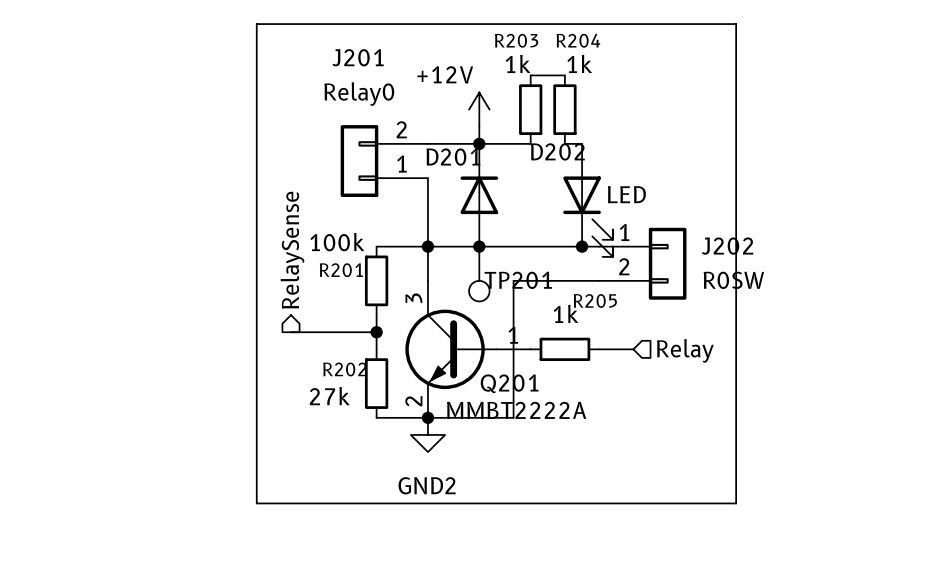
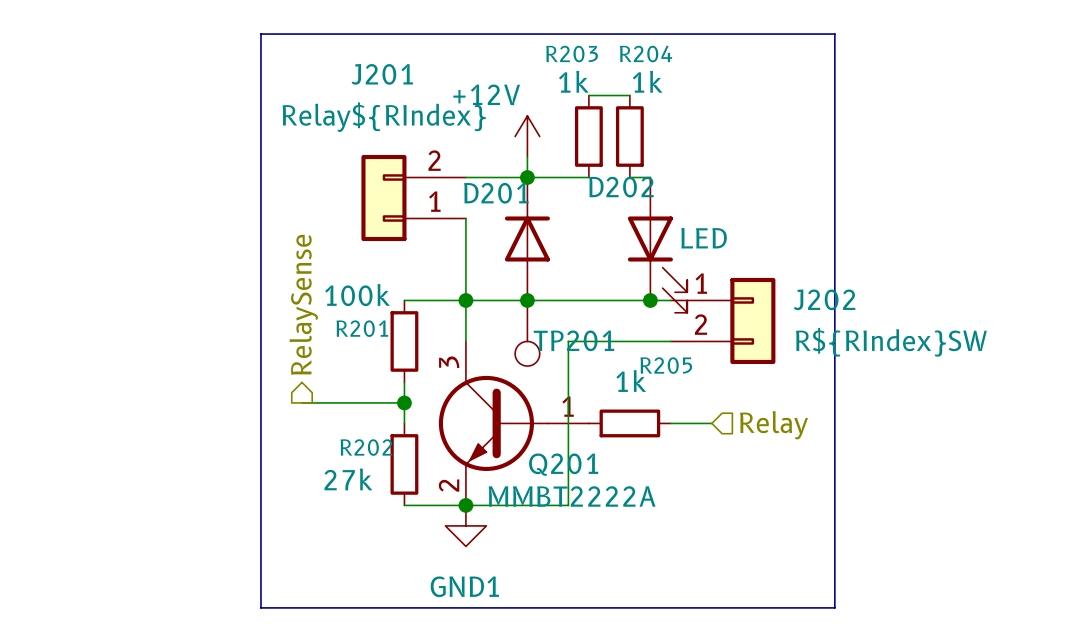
J201 value: Relay0 (359, 94) -> Relay${RIndex} (384, 117)
J202 value: R0SW (733, 280) -> R${RIndex}SW (891, 342)
power symbol: GND2 (427, 434) -> GND1 (465, 525)

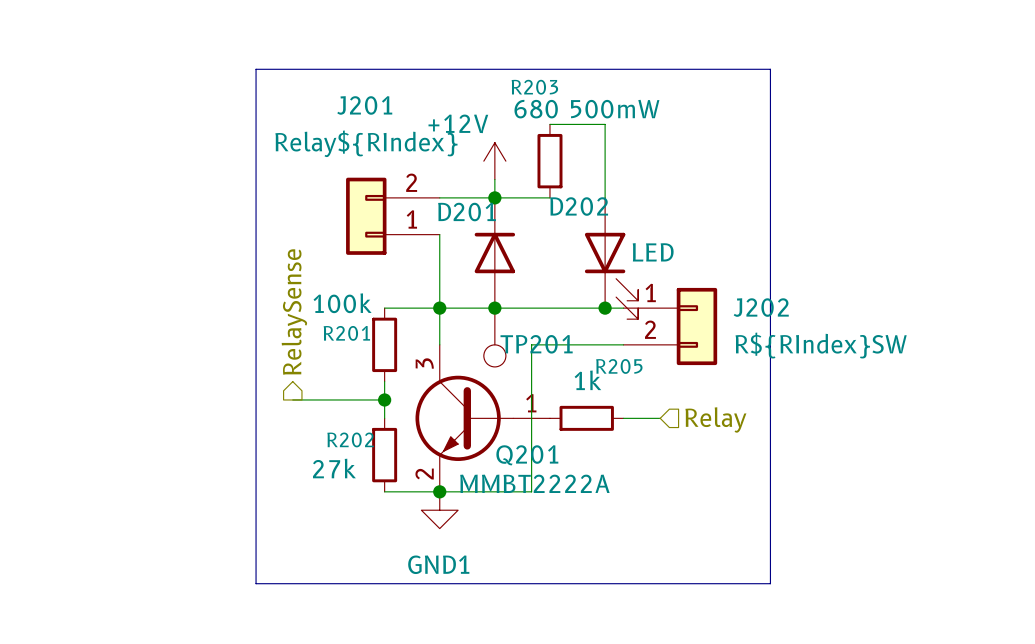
R203 value: 1k (573, 81) -> 680 500mW (586, 109)
R204: 1k (629, 136) -> none
wire: (629, 177) (650, 177) -> (586, 124) (605, 124) (605, 197)

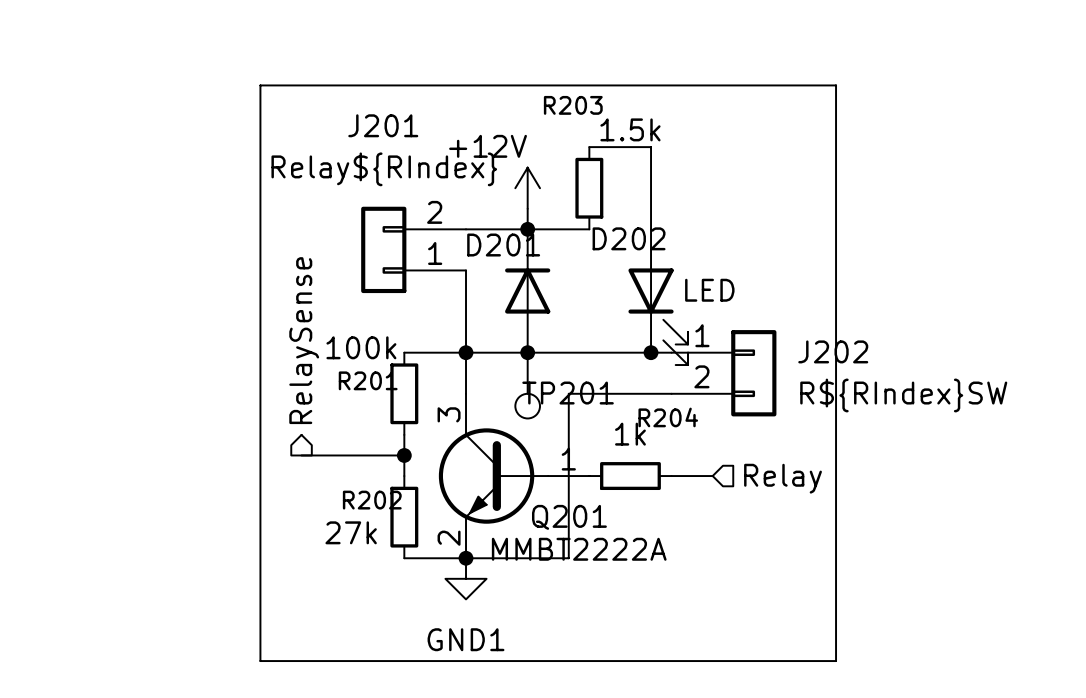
R203 value: 680 500mW (586, 109) -> 1.5k (630, 129)
R205 name: R205 (619, 366) -> R204 (668, 417)

